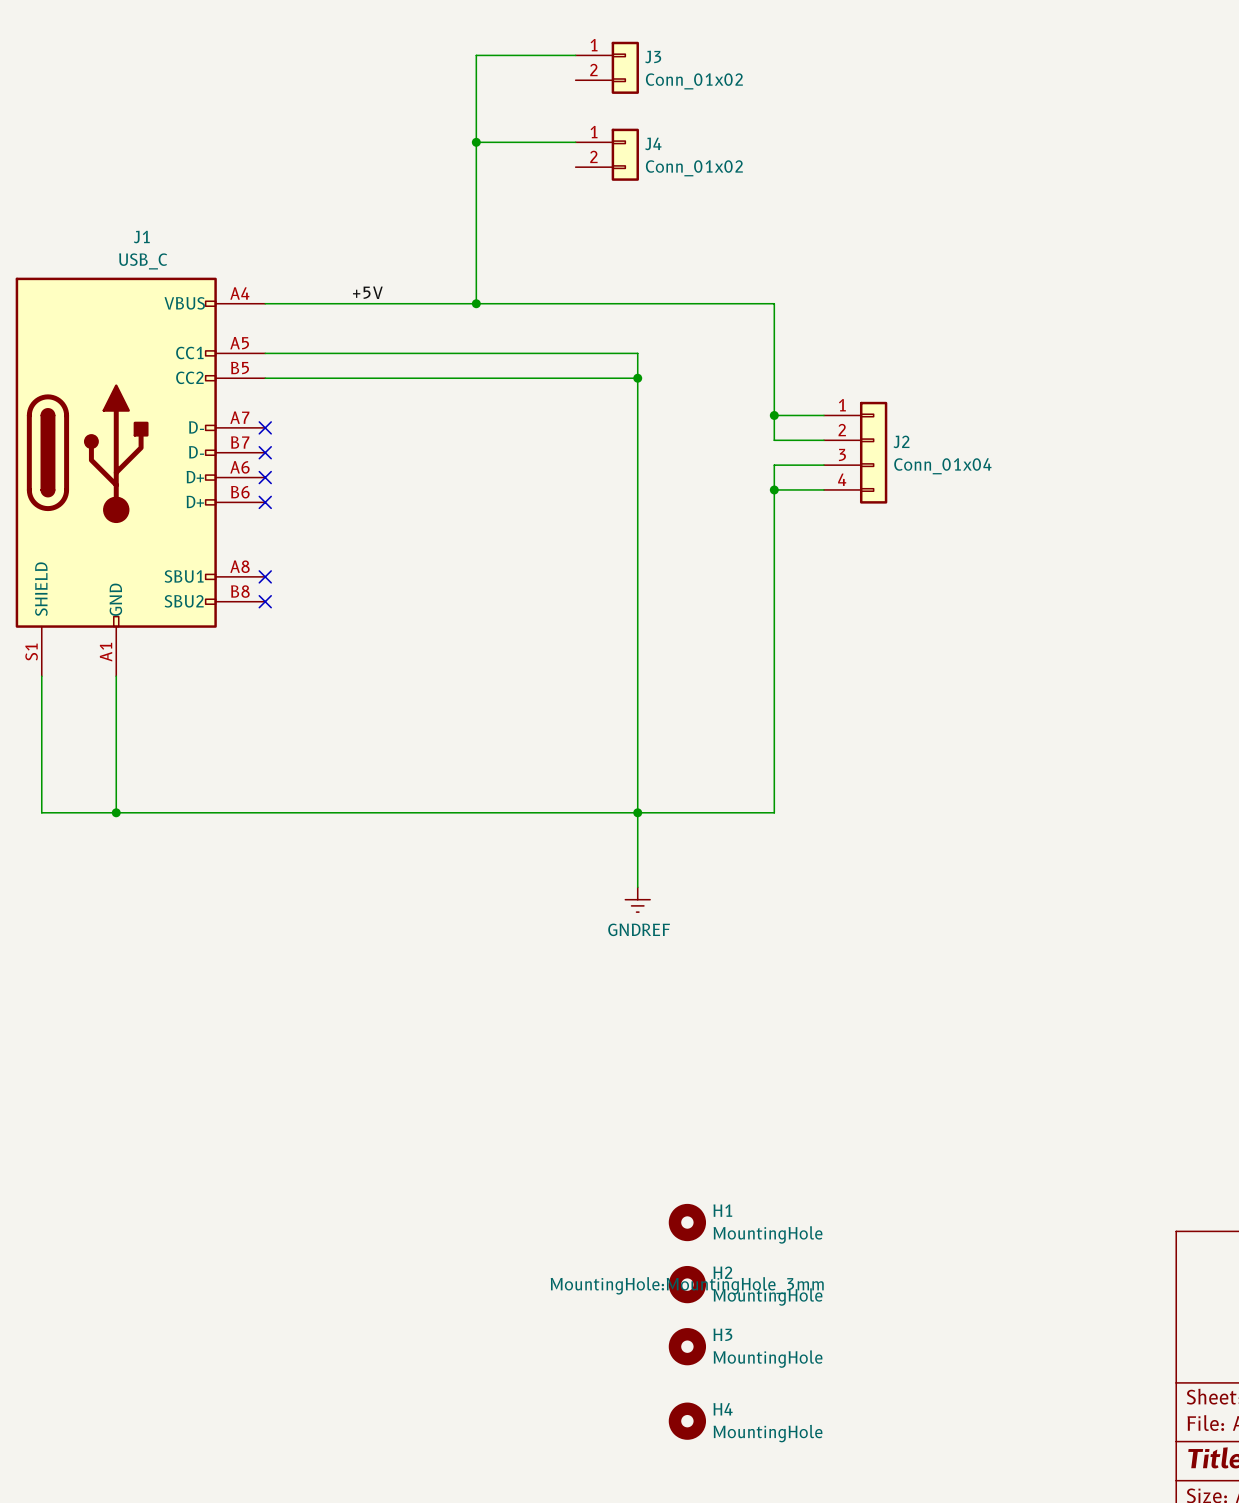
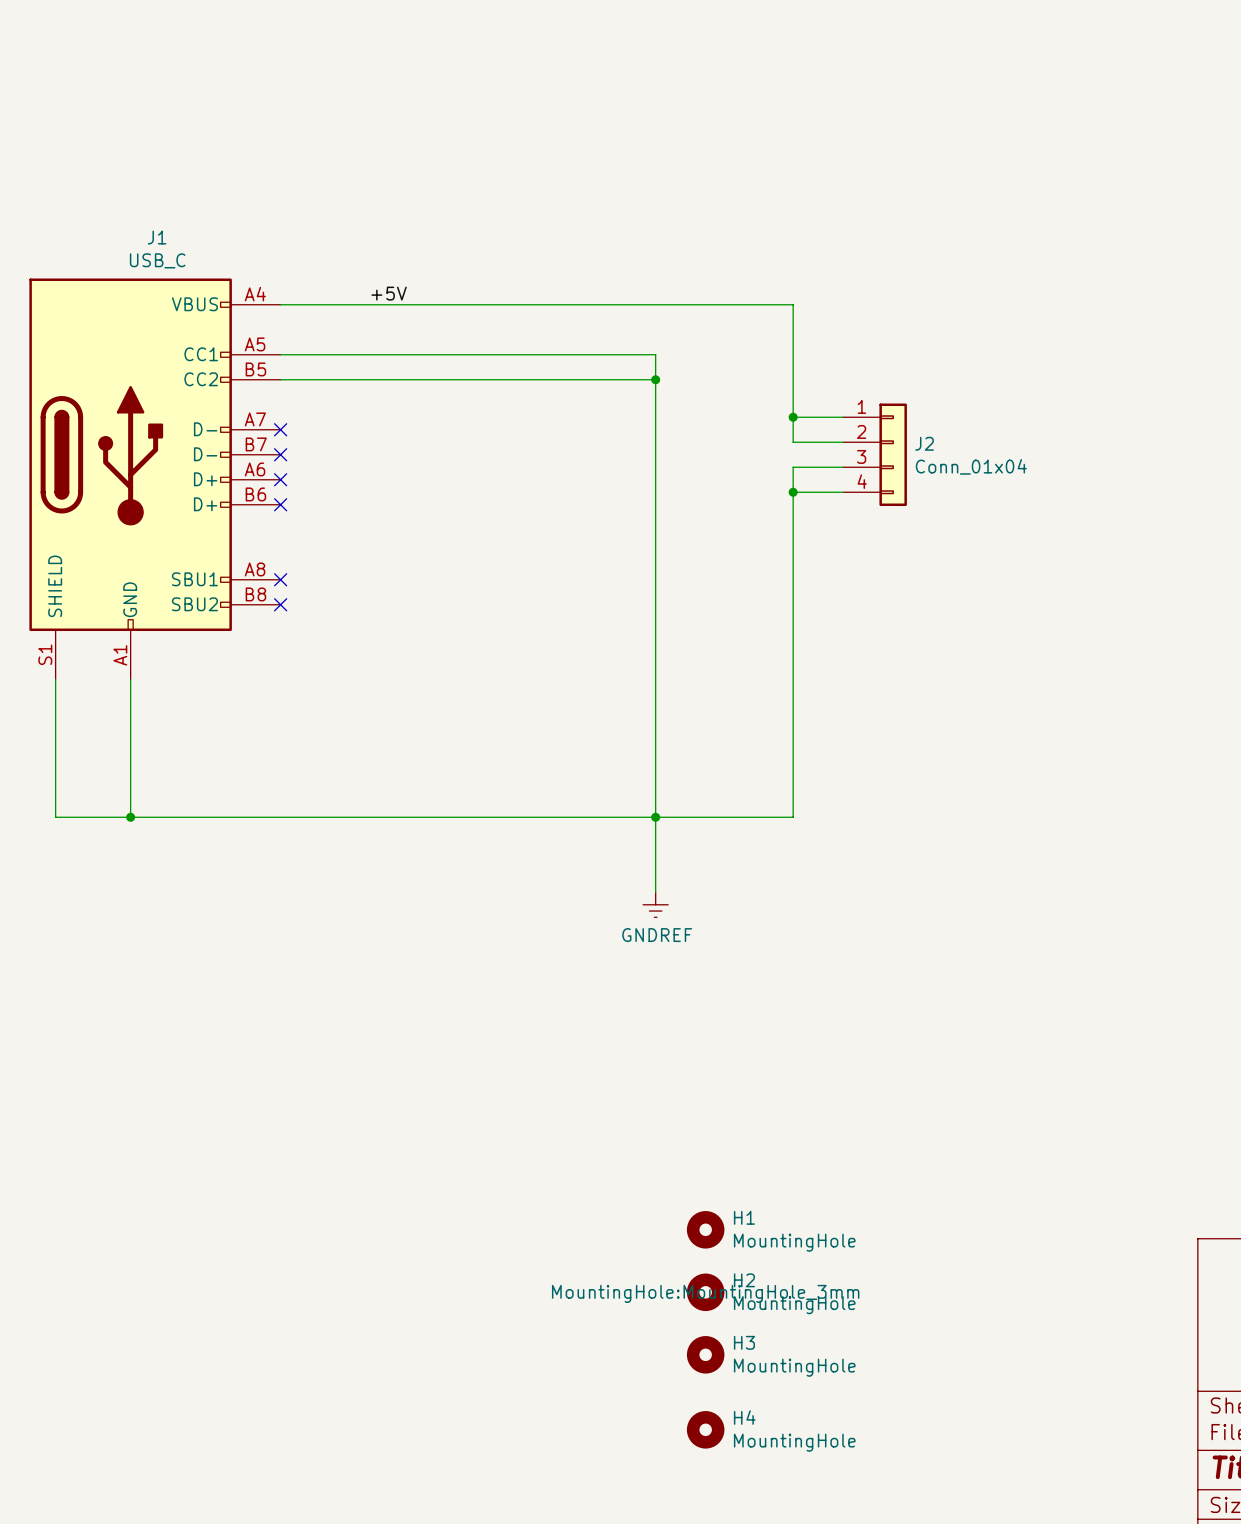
wire: (575, 55) (476, 55) (476, 303) -> none
J3: Conn_01x02 (607, 67) -> none
wire: (476, 142) (575, 142) -> none
junction: (476, 142) -> none
J4: Conn_01x02 (607, 154) -> none
junction: (476, 303) -> none

